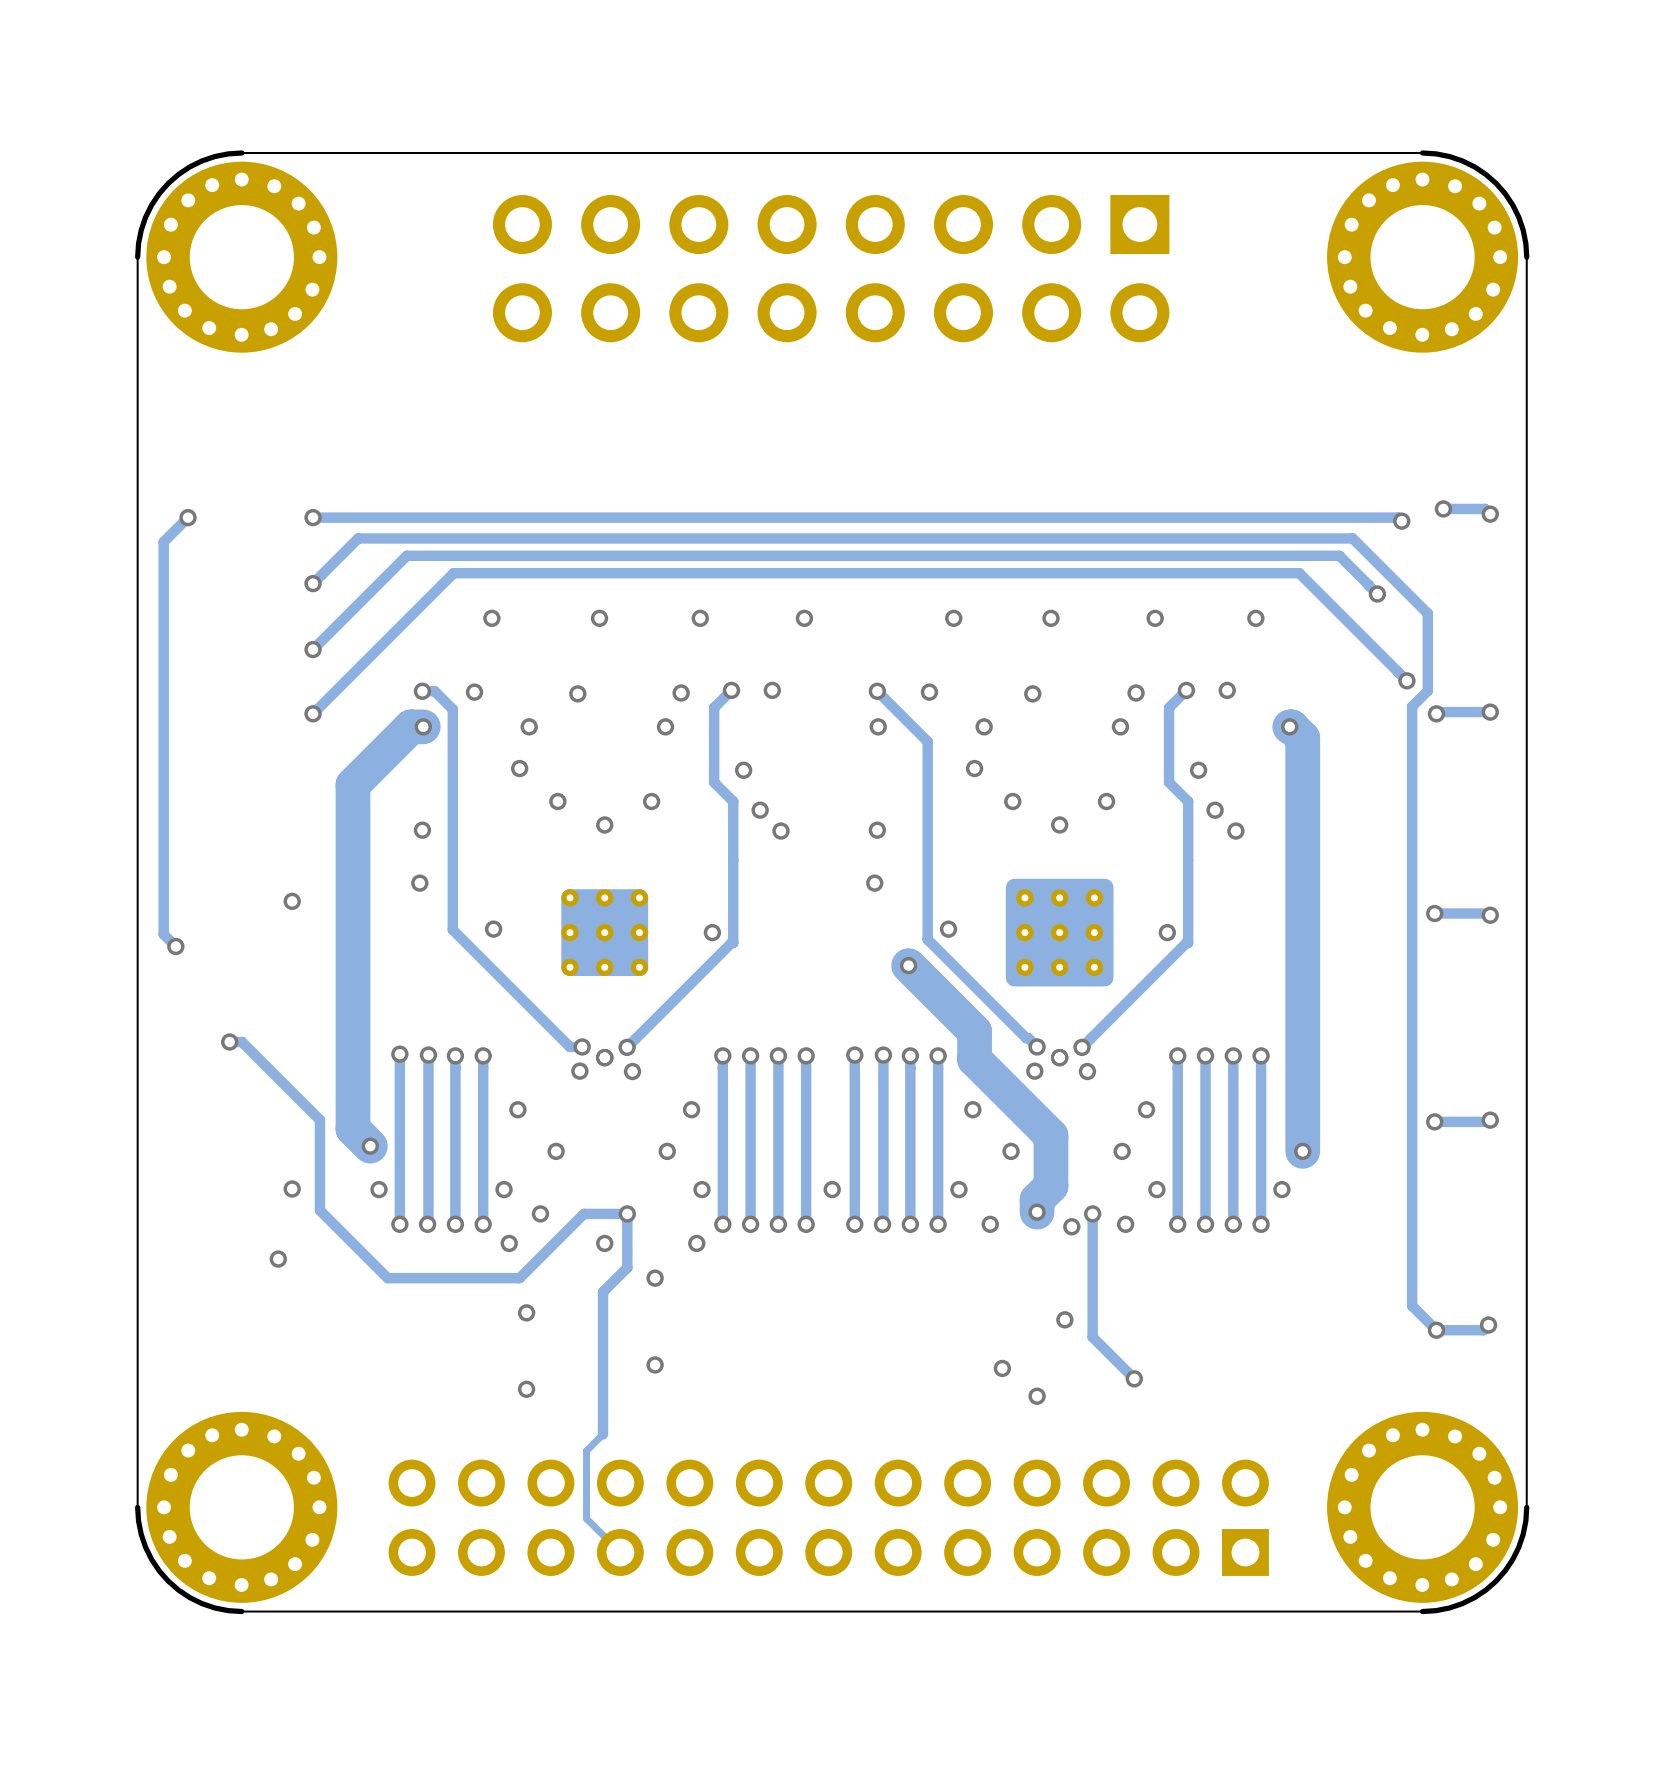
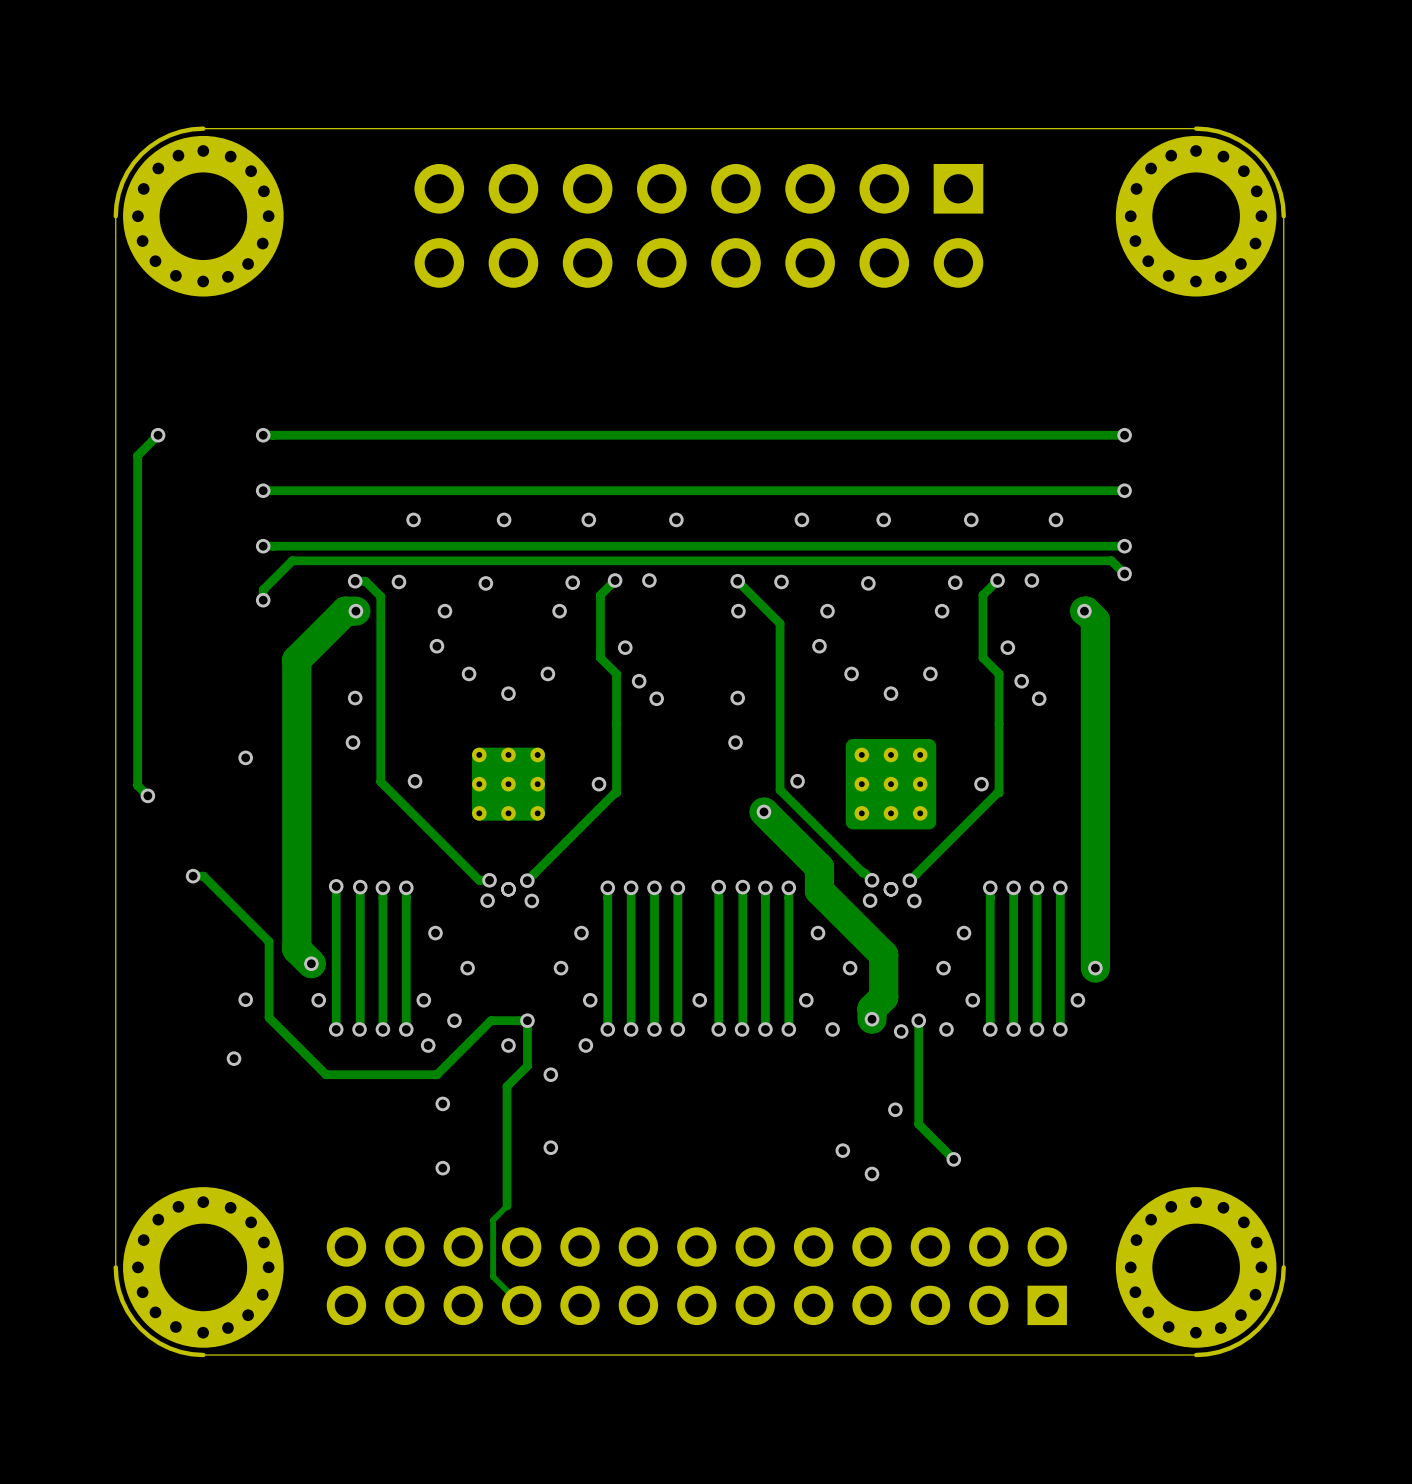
track: (1443, 508) (1485, 508) (1490, 514) -> none
via: (1443, 508) -> none
via: (1490, 514) -> none
track: (1337, 517) (1398, 517) (1401, 521) -> none
via: none -> (1124, 435)
via: (1401, 521) -> none
track: (313, 583) (358, 538) (1352, 538) (1427, 613) (1427, 690) (1412, 706) (1412, 1305) (1436, 1330) (1483, 1330) (1488, 1325) -> (263, 490) (1124, 490)
via: none -> (1124, 490)
track: (1377, 594) (1339, 555) (406, 555) (313, 649) -> (1124, 546) (263, 546)
via: (1377, 594) -> none
via: none -> (1124, 546)
track: (1406, 680) (1299, 573) (453, 573) (313, 713) -> (1124, 573) (1111, 560) (292, 560) (263, 589) (263, 600)
via: (1406, 680) -> none
via: none -> (1124, 573)
track: (1490, 712) (1438, 712) (1436, 713) -> none
via: (1490, 712) -> none
via: (1436, 713) -> none
track: (1434, 913) (1488, 913) (1490, 915) -> none
via: (1434, 913) -> none
via: (1490, 915) -> none
track: (1490, 1120) (1488, 1121) (1434, 1121) -> none
via: (1490, 1120) -> none
via: (1434, 1121) -> none
via: (1488, 1325) -> none
via: (1436, 1330) -> none

